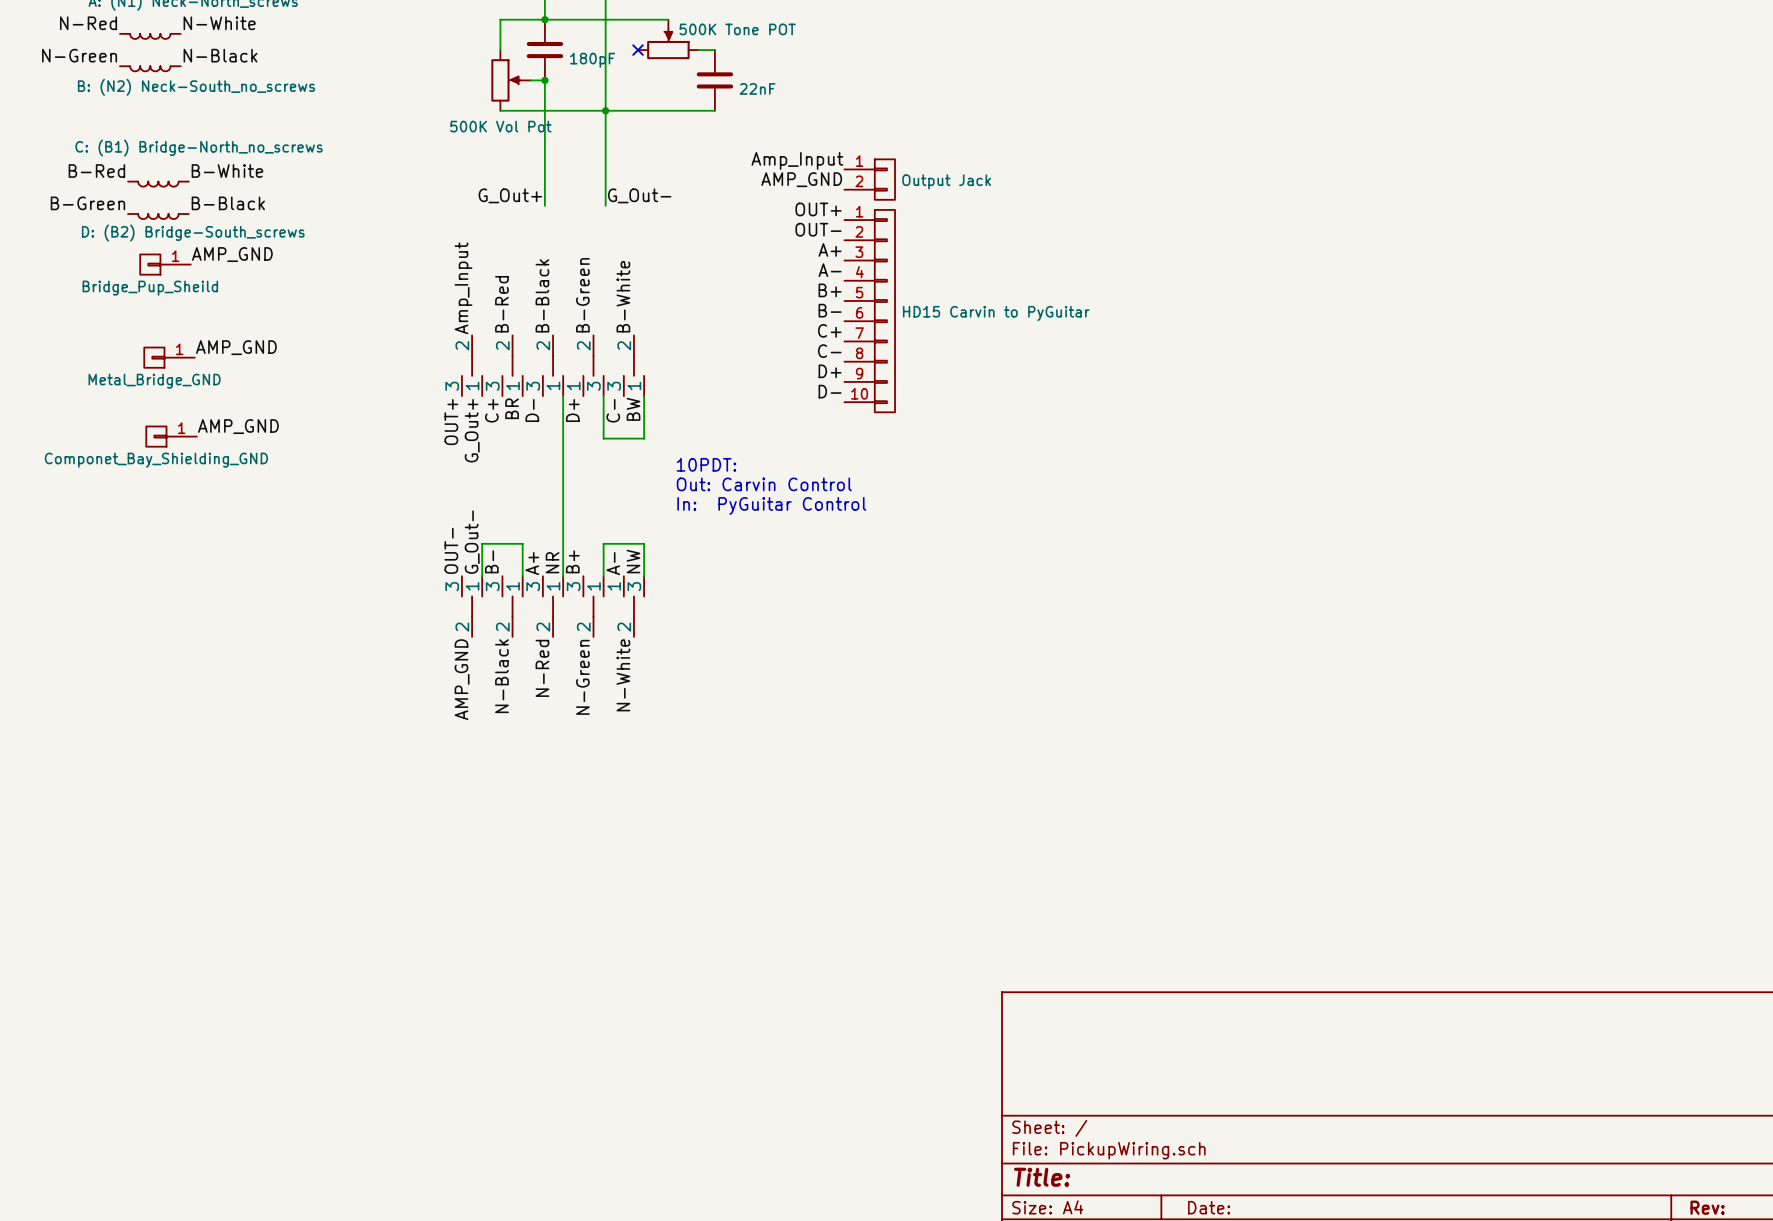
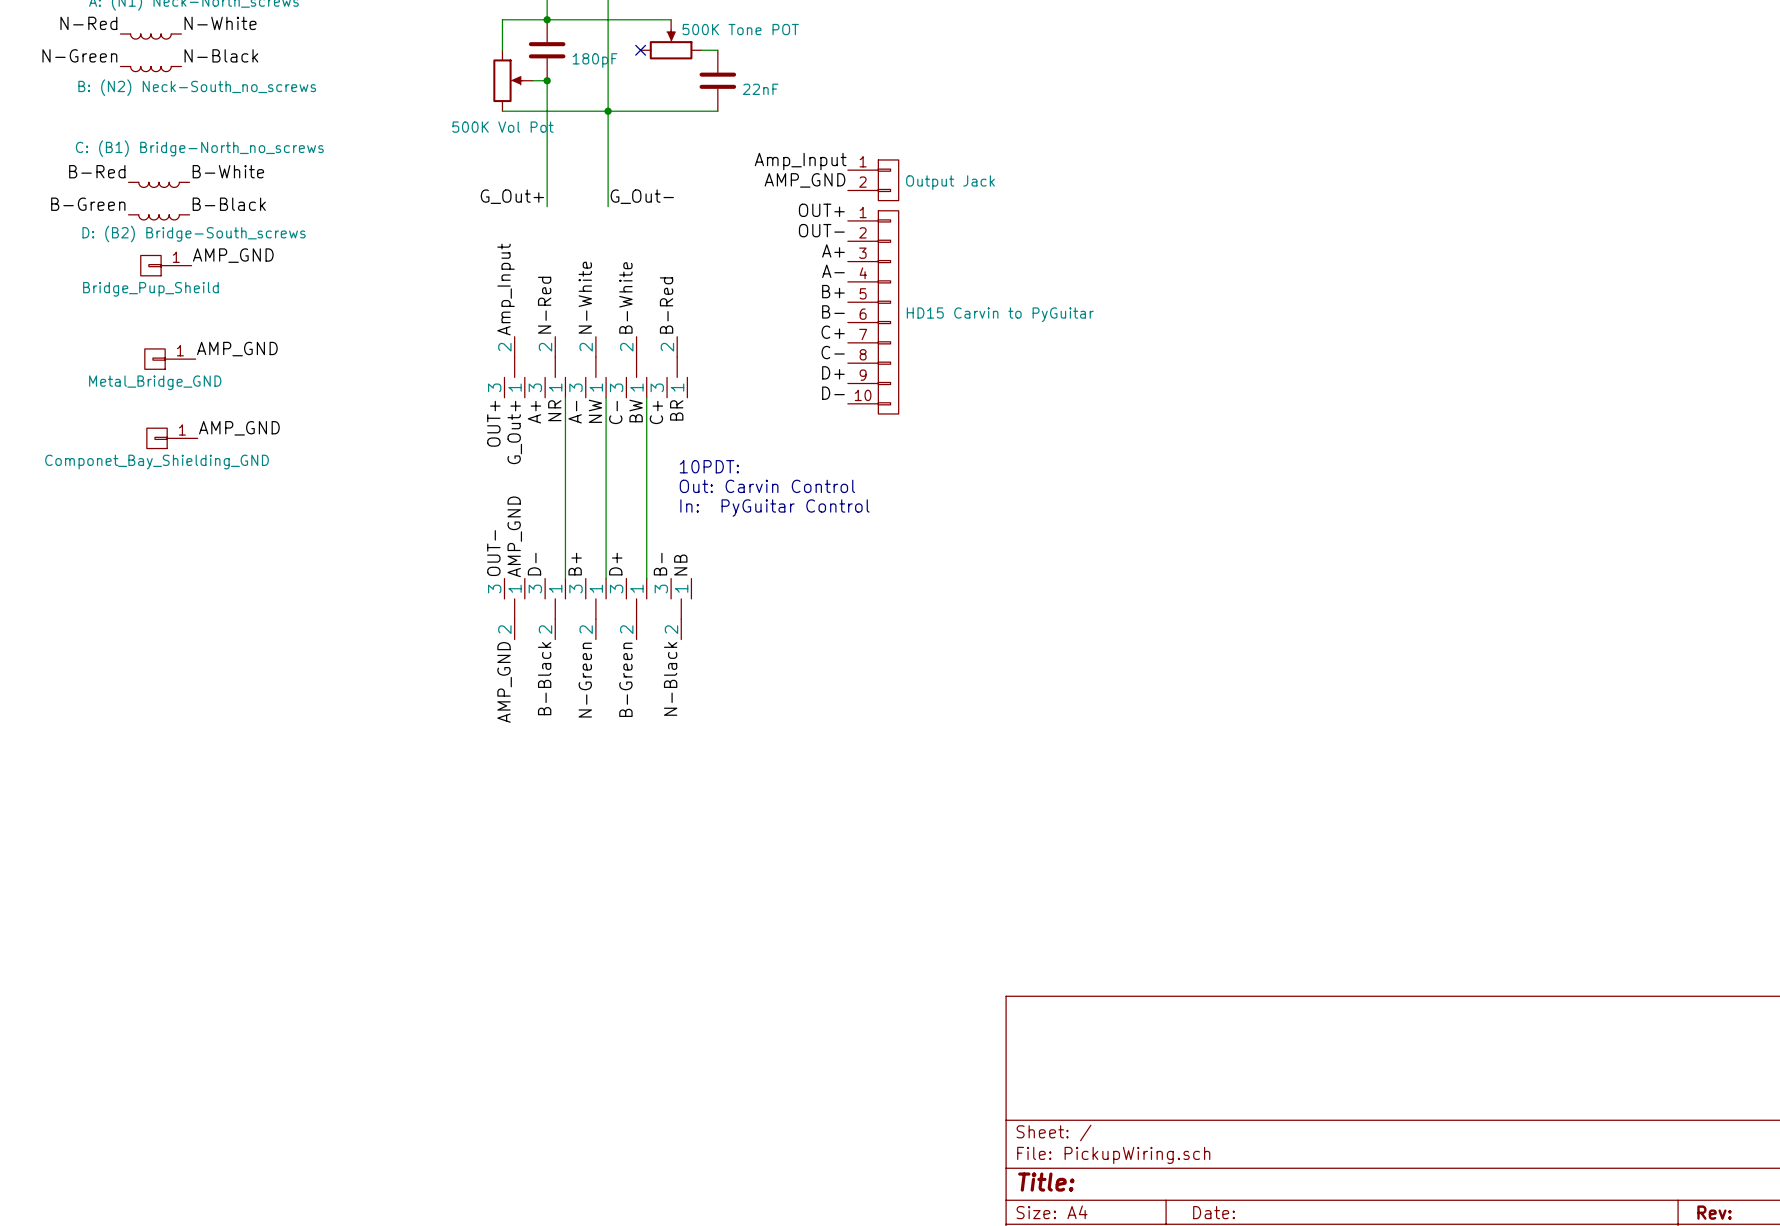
label: Amp_Input (463, 288) -> none
label: B-Black (542, 295) -> N-Red (544, 305)
label: B-Green (582, 295) -> N-White (585, 297)
label: B-Red (501, 304) -> Amp_Input (506, 289)
label: none -> B-Red (666, 305)
part: (472, 365) -> none
part flip: as is (593, 365) -> left-right (595, 367)
part: none -> (677, 367)
label: BR (512, 408) -> G_Out+ (514, 432)
label: none -> BR (676, 410)
label: C+ (491, 410) -> OUT+ (493, 423)
label: D- (532, 410) -> A+ (534, 412)
label: D+ (572, 410) -> A- (575, 412)
label: none -> C+ (656, 412)
label: OUT+ (451, 422) -> none
label: G_Out+ (472, 430) -> none
wire: (603, 438) (644, 438) -> (606, 440) (606, 546)
label: G_Out- (472, 542) -> none
wire: (603, 543) (644, 543) -> (646, 440) (646, 546)
label: OUT- (451, 550) -> none
label: B- (491, 561) -> OUT- (493, 553)
label position: NW (633, 561) -> NW (595, 411)
label: none -> B- (660, 564)
label position: NR (552, 562) -> NR (554, 410)
label: none -> NB (680, 564)
label: A+ (532, 563) -> D- (534, 564)
label: A- (613, 563) -> D+ (615, 564)
wire: (482, 576) (482, 543) (522, 543) (522, 576) -> none
part: (472, 606) -> none
part flip: as is (633, 606) -> left-right (636, 609)
part: none -> (681, 609)
label: N-Red (542, 668) -> B-Black (544, 678)
label: N-White (623, 675) -> B-Green (625, 679)
label: N-Black (501, 676) -> AMP_GND (504, 682)
label: none -> N-Black (670, 678)
label position: AMP_GND (462, 679) -> AMP_GND (514, 536)

